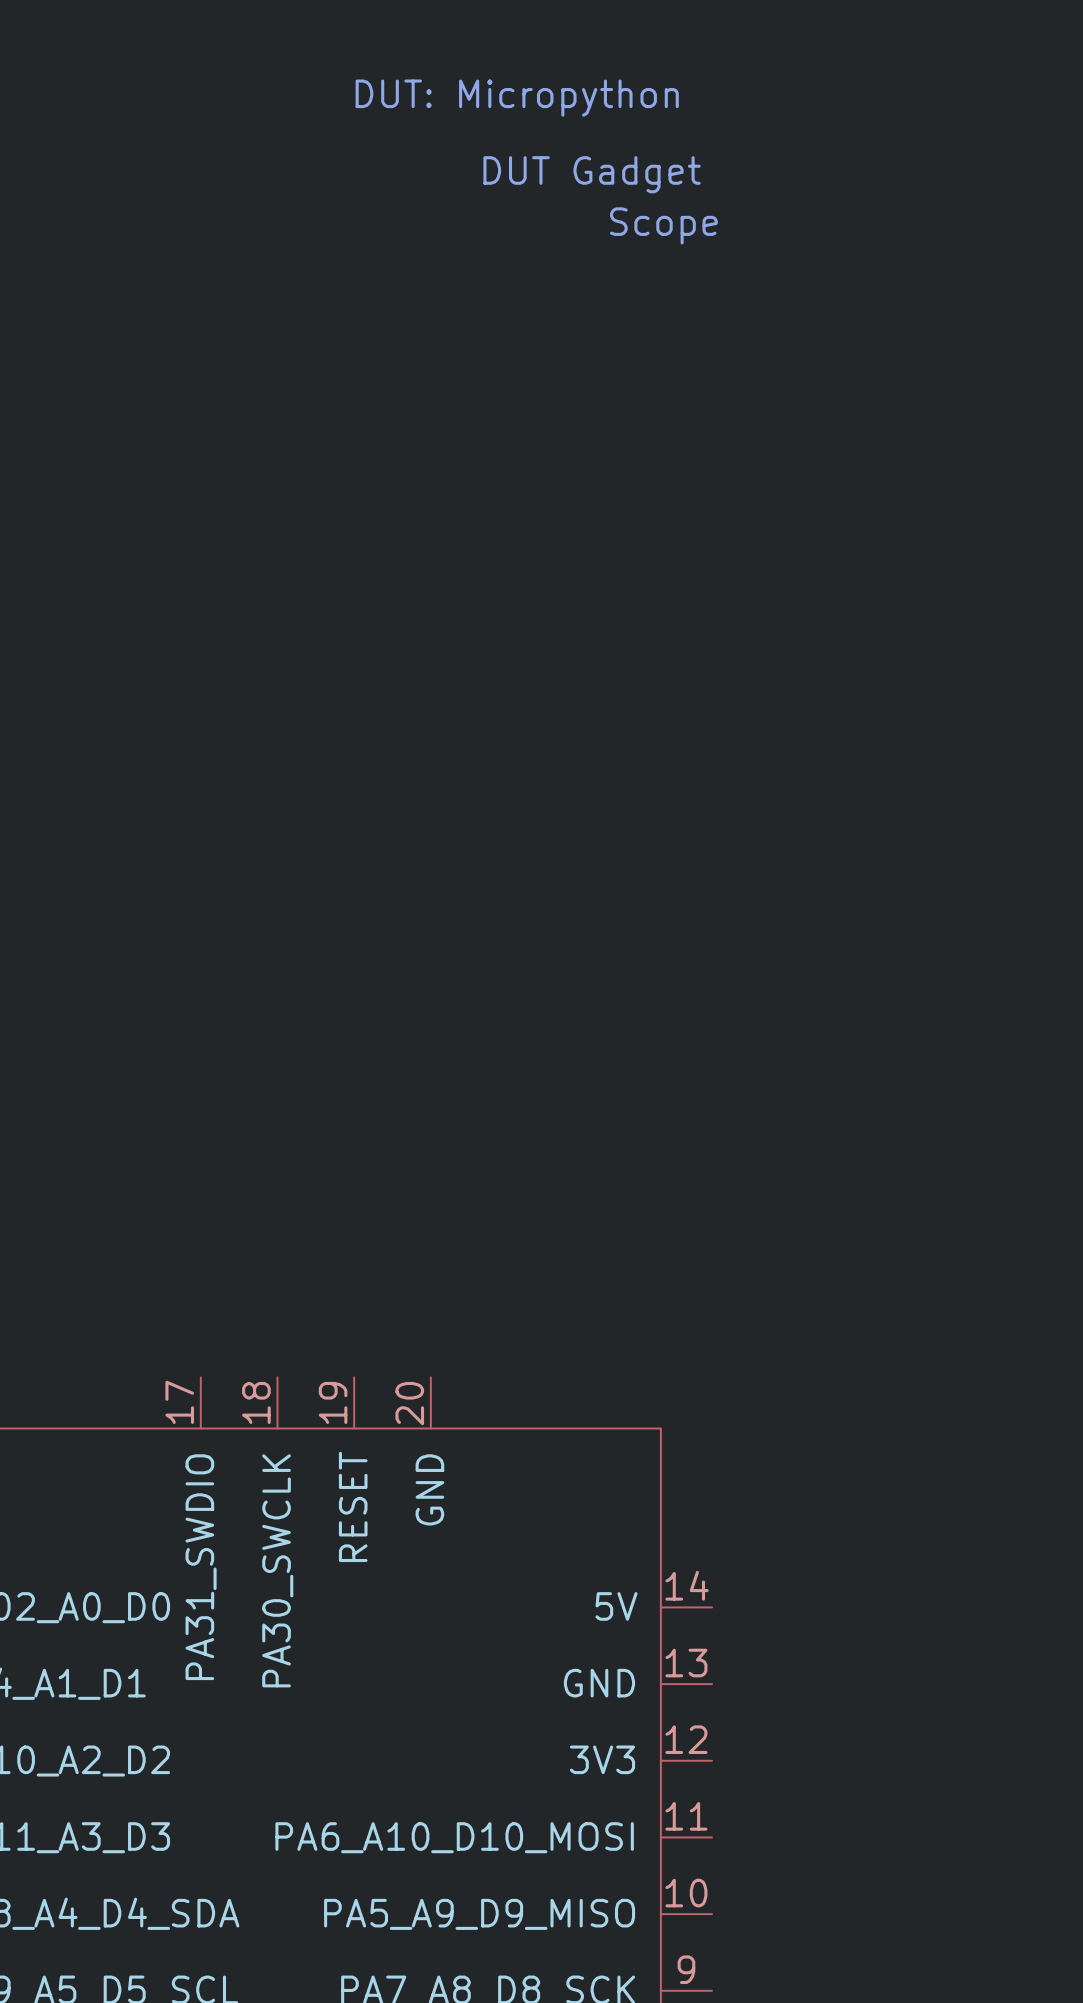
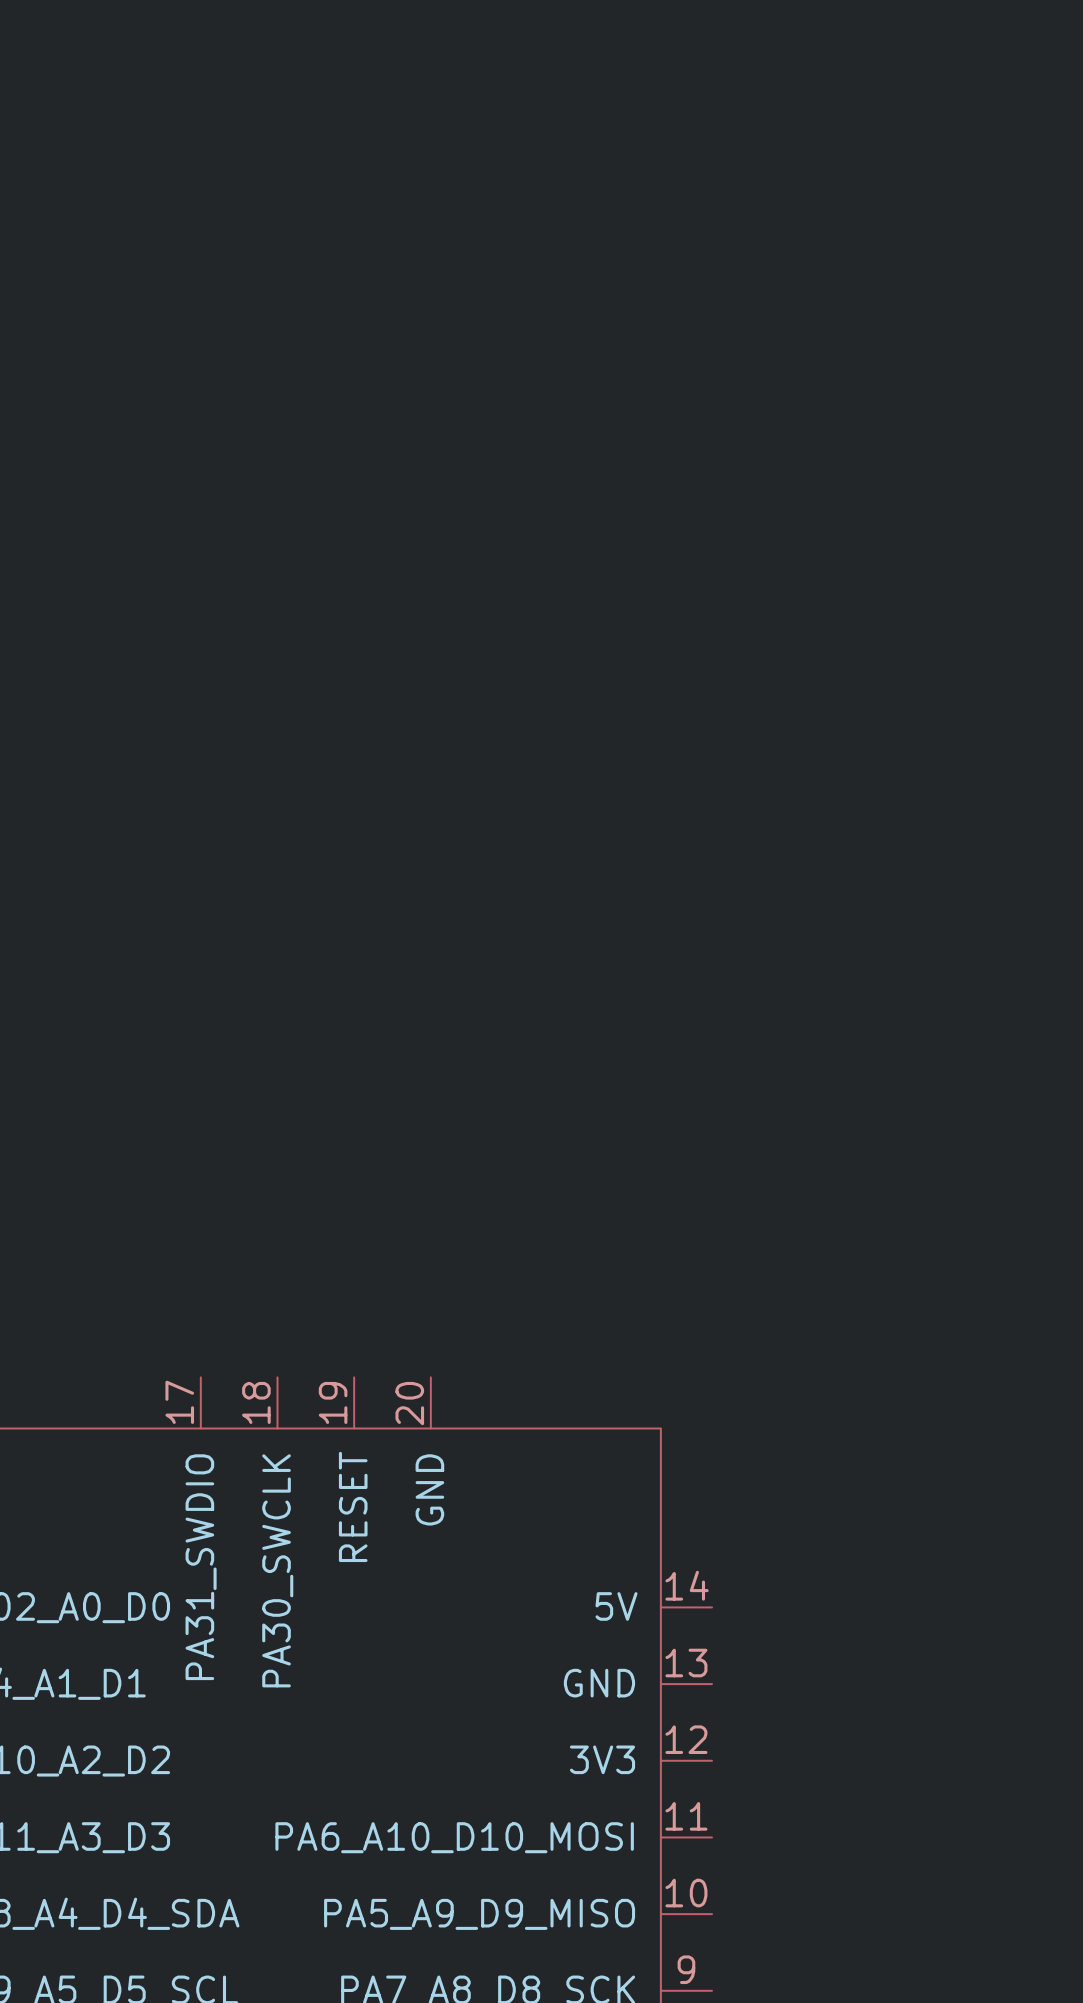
text: DUT: Micropython (517, 98) -> none
text: DUT Gadget (592, 174) -> none
text: Scope (663, 225) -> none

